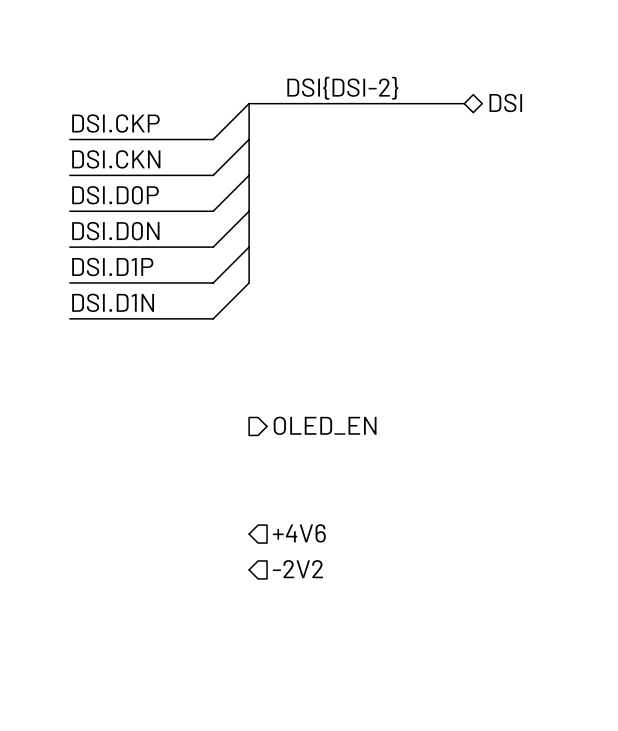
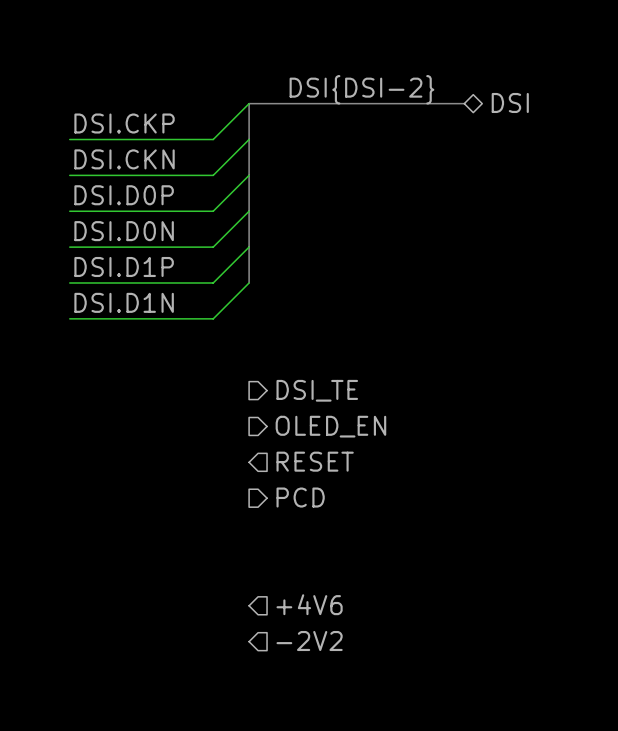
hierarchical label: none -> DSI_TE (317, 390)
hierarchical label: none -> RESET (315, 461)
hierarchical label: none -> PCD (300, 497)
hierarchical label position: +4V6 (299, 533) -> +4V6 (309, 604)
hierarchical label position: -2V2 (297, 569) -> -2V2 (309, 641)

